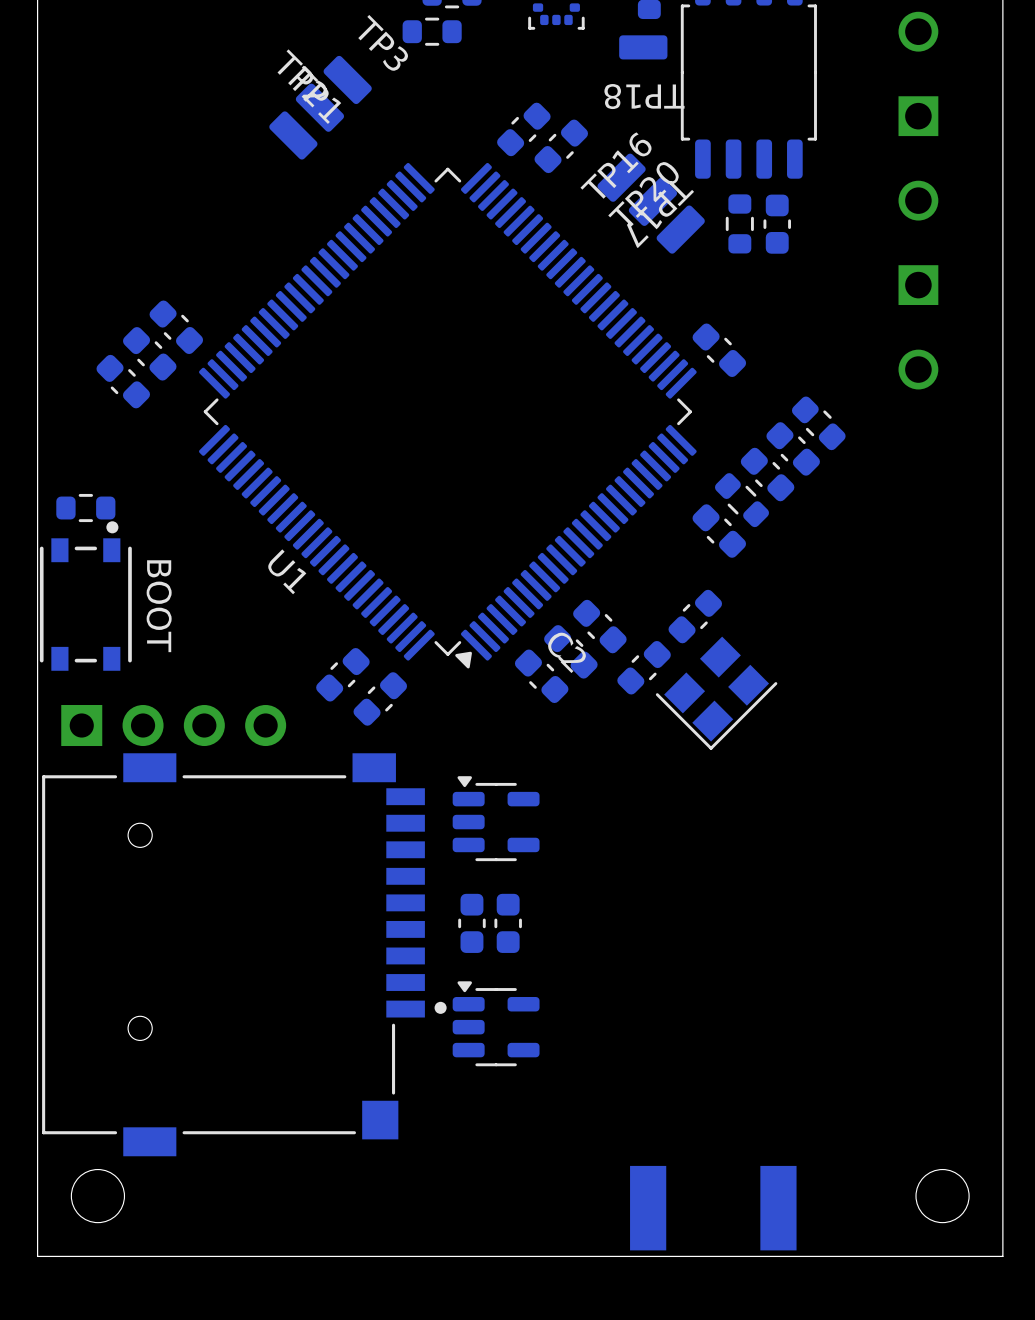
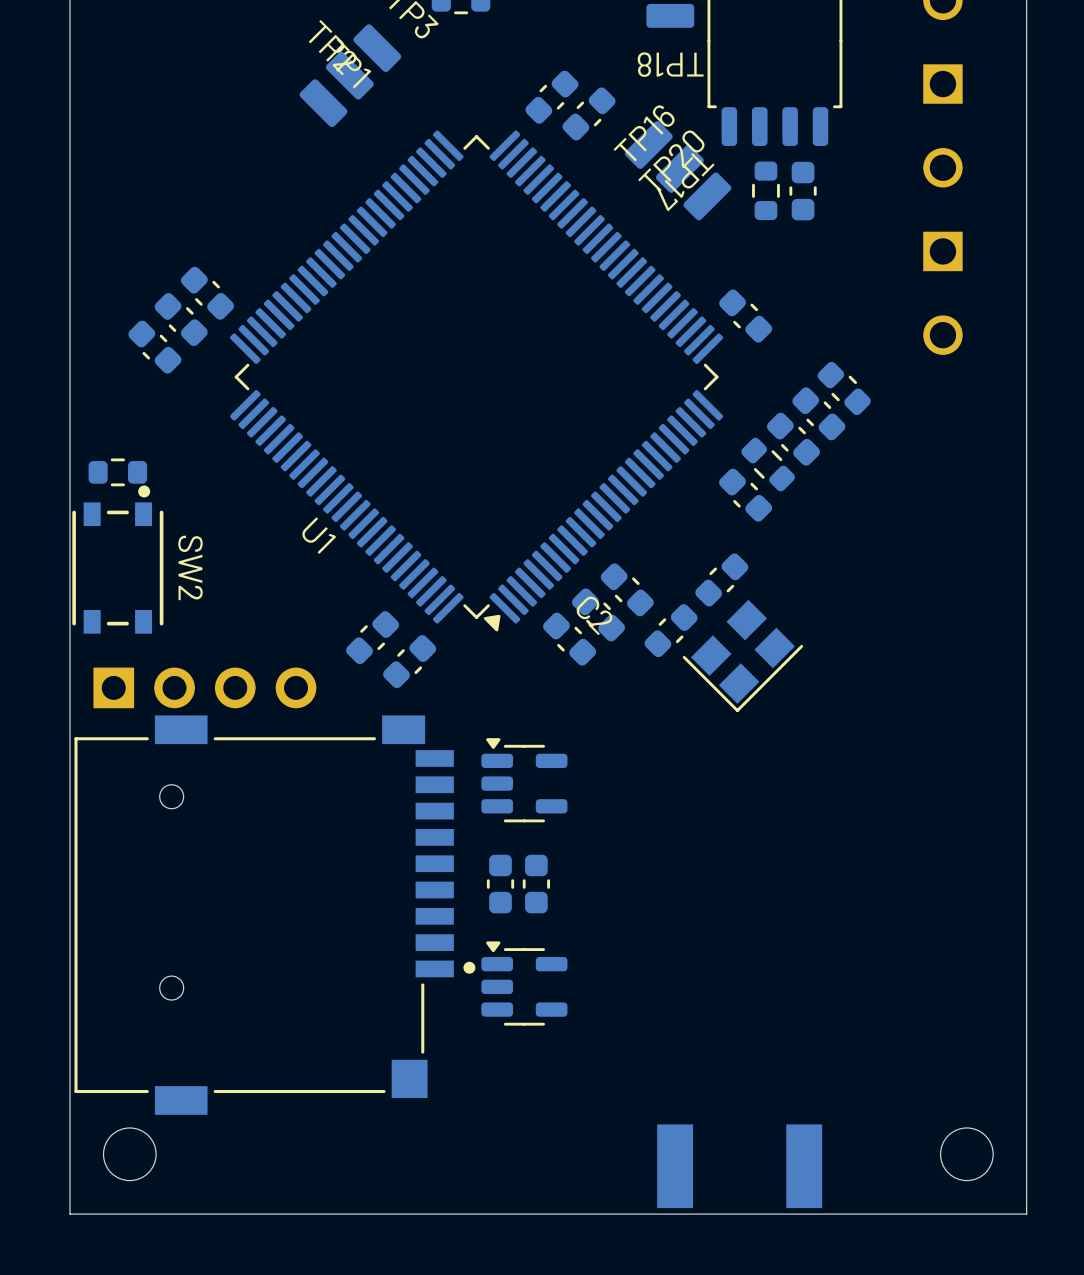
BOOT name: BOOT (159, 606) -> SW2 (190, 567)

